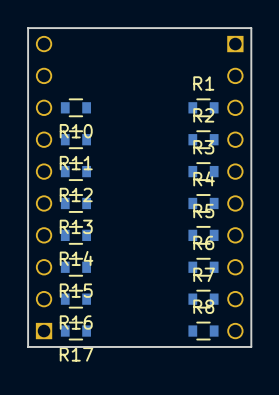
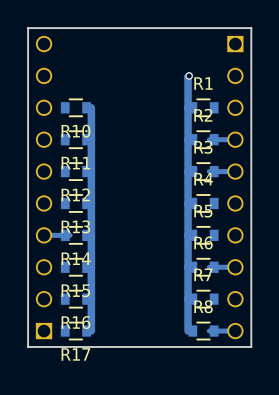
track: none -> (189, 75) (188, 331)
via: none -> (189, 75)
track: none -> (91, 107) (91, 331)
track: none -> (235, 139) (209, 139)
track: none -> (235, 171) (209, 171)
track: none -> (70, 235) (44, 235)
track: none -> (235, 267) (209, 267)
track: none -> (235, 331) (209, 331)

